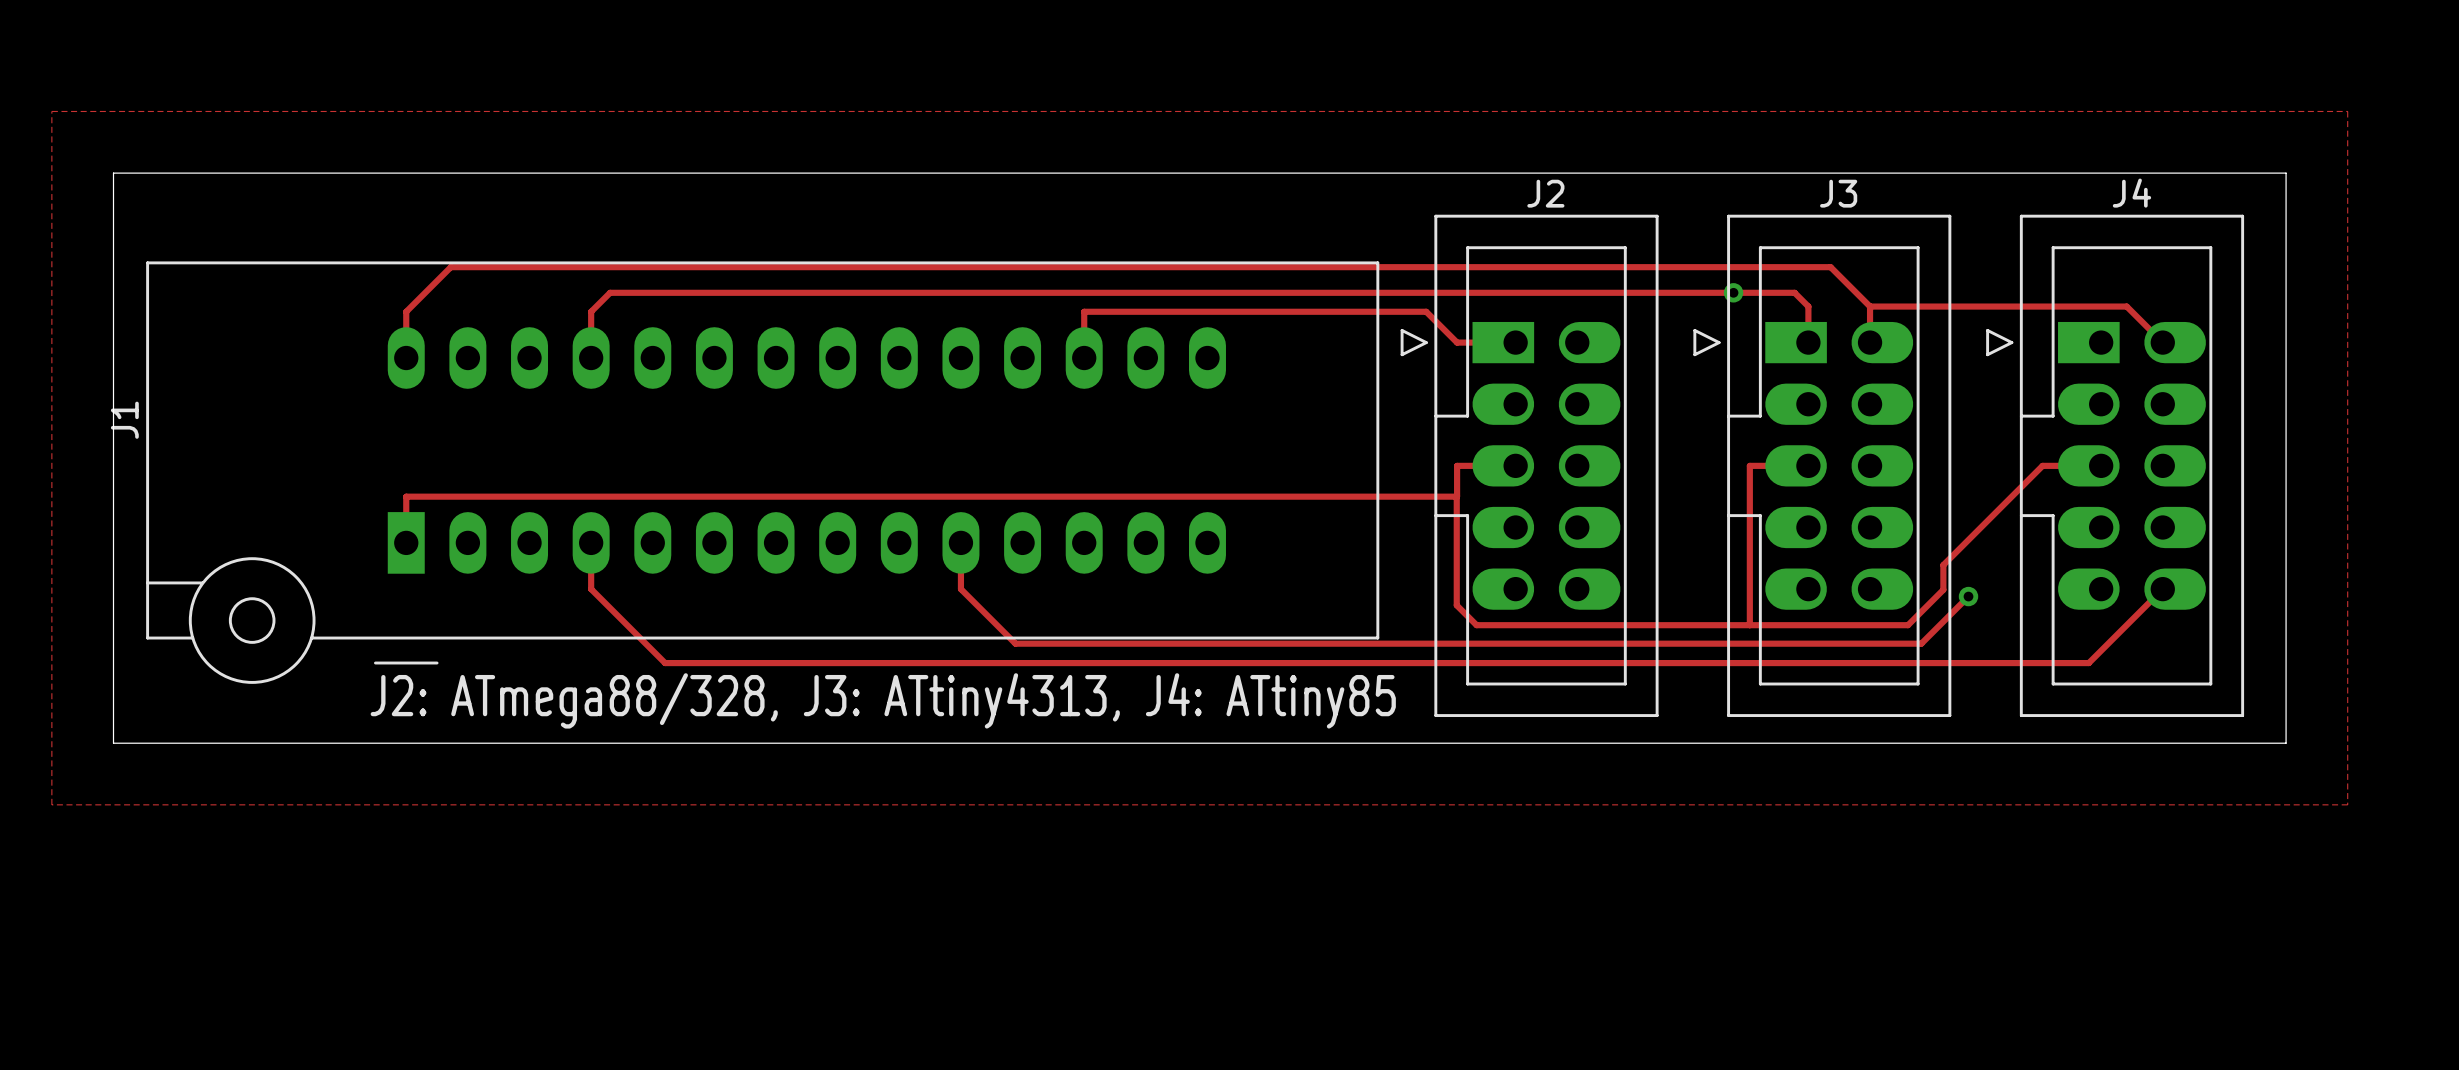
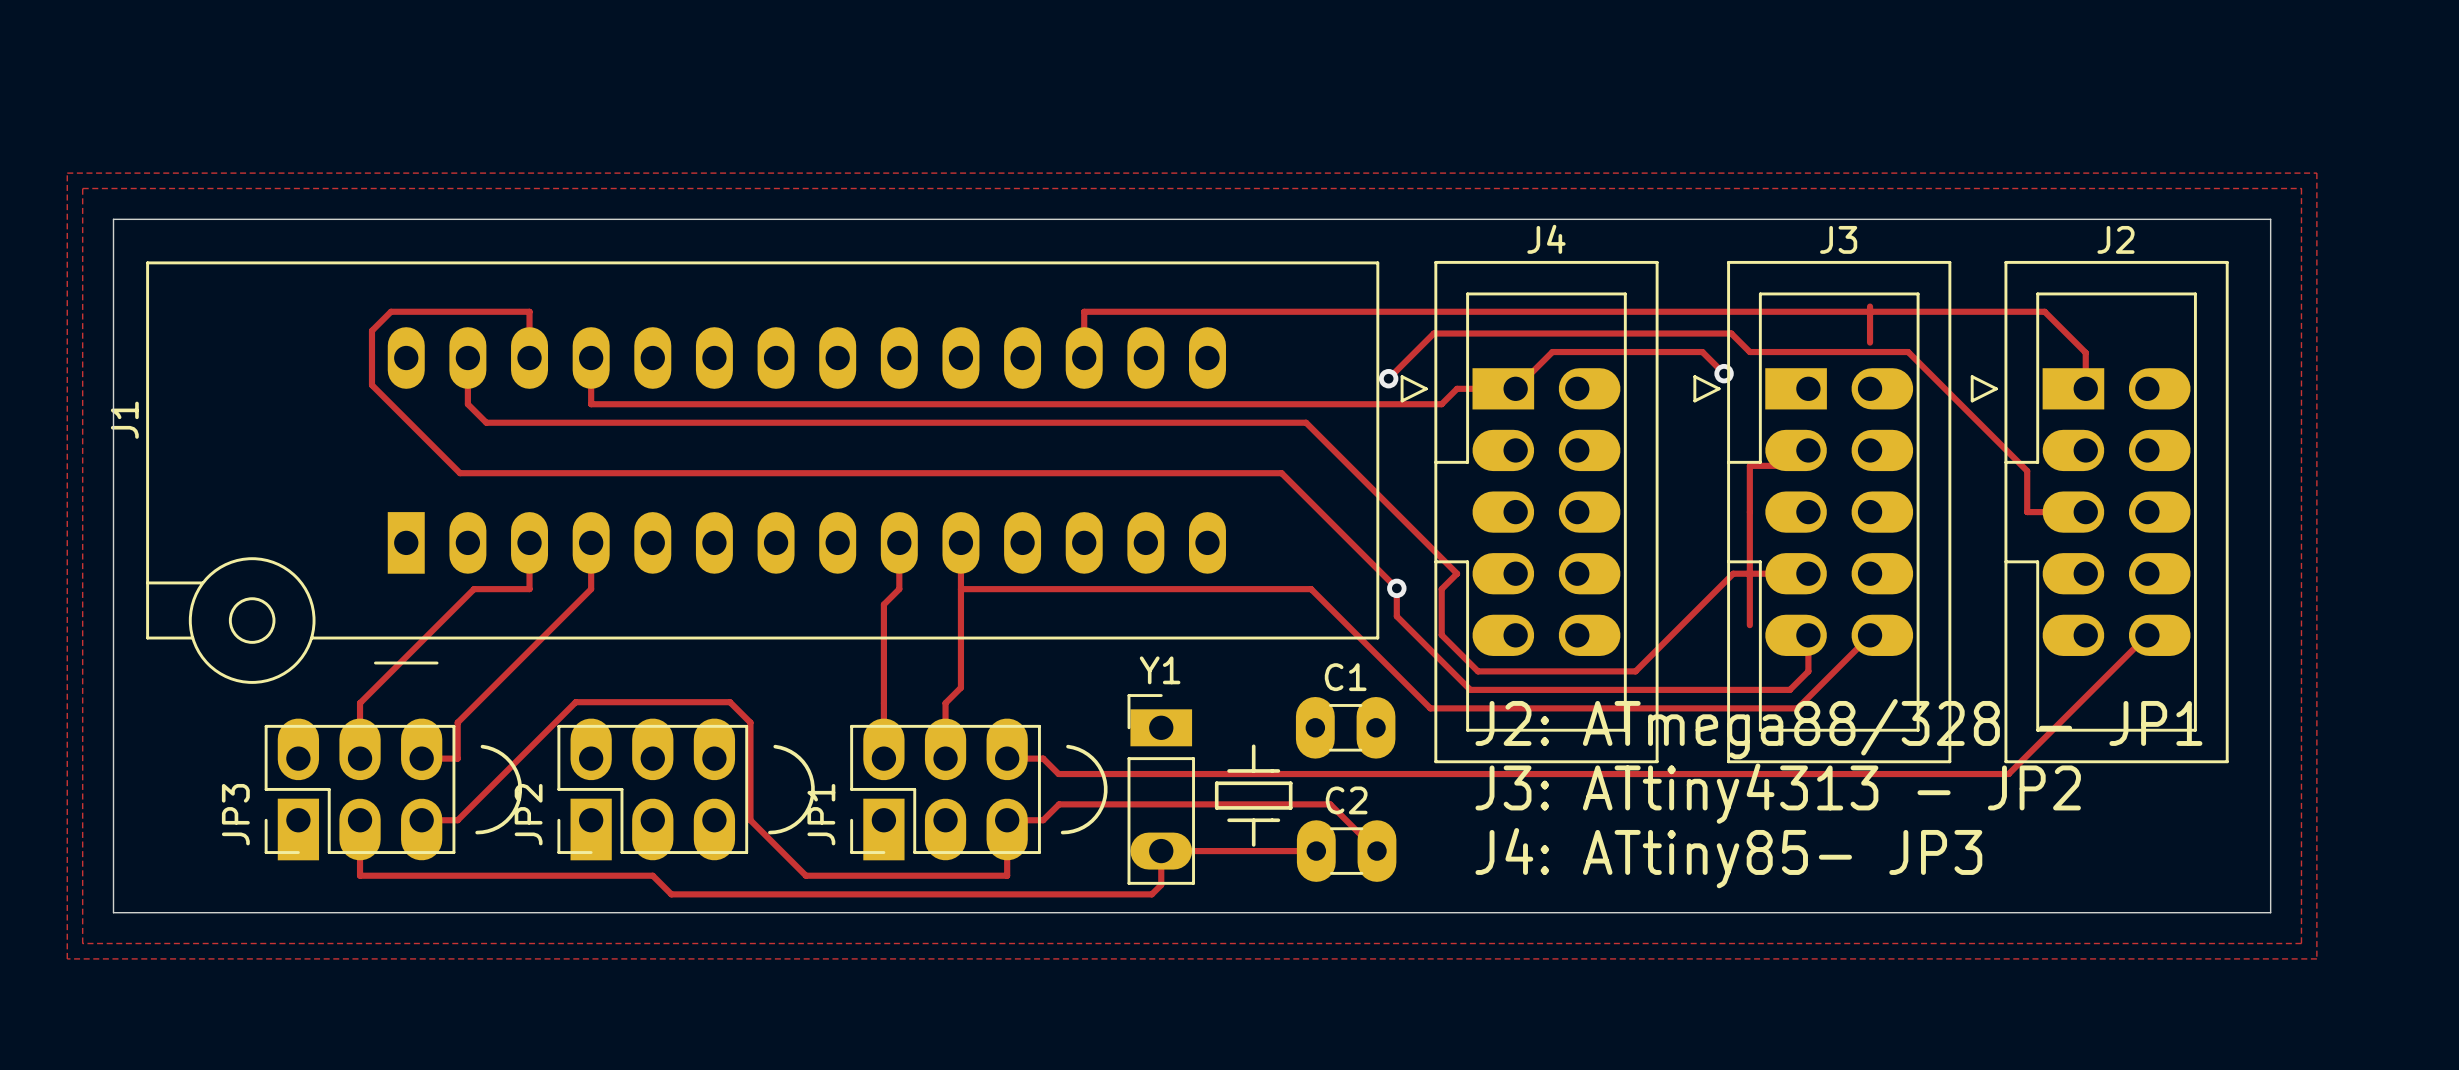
zone outline: (51, 111) (51, 804) (2347, 804) (2347, 111) (51, 111) -> (67, 173) (67, 958) (2316, 958) (2316, 173) (67, 173)
zone outline: none -> (82, 188) (82, 943) (2301, 943) (2301, 188) (82, 188)
board edge: (113, 219) (113, 173) (2286, 173) (2286, 743) (113, 743) -> (113, 219) (2270, 219) (2270, 912) (113, 912) (113, 743)
via position: (1733, 292) -> (1724, 373)
track: (1426, 311) (1457, 342) (1515, 342) -> (1426, 311) (2044, 311) (2085, 352) (2085, 388)
track: (1808, 342) (1808, 306) (1794, 292) (610, 292) (591, 311) (591, 358) -> (1724, 373) (1702, 352) (1552, 352) (1515, 388) (1457, 388) (1441, 404) (591, 404) (591, 358)
track: (2162, 342) (2126, 306) (1870, 306) (1830, 267) (450, 267) (406, 311) (406, 358) -> none
track: none -> (467, 358) (467, 404) (486, 422) (1306, 422) (1457, 573) (1441, 589) (1441, 635) (1478, 671) (1635, 671) (1733, 573) (1808, 573)
track: none -> (529, 358) (529, 311) (391, 311) (371, 330) (371, 385) (460, 473) (1281, 473) (1396, 588) (1396, 616) (1470, 689) (1789, 689) (1808, 671) (1808, 635)
track: none -> (1388, 378) (1433, 333) (1731, 333) (1749, 352) (1908, 352) (2027, 471) (2027, 512) (2085, 512)
via: none -> (1388, 378)
track: (1515, 465) (1457, 465) (1457, 496) -> none
J2 position: (1529, 465) -> (2099, 512)
J3 position: (1822, 465) -> (1822, 512)
track: (2101, 465) (2042, 465) (1943, 565) (1943, 589) (1908, 625) (1476, 625) (1456, 605) (1456, 496) (406, 496) (406, 542) -> none
J4 position: (2115, 465) -> (1529, 512)
track: none -> (529, 542) (529, 589) (474, 589) (360, 703) (360, 758)
track: none -> (899, 542) (899, 589) (883, 604) (883, 758)
via: none -> (1396, 588)
track: (591, 589) (665, 663) (2088, 663) (2162, 589) -> (591, 589) (457, 722) (457, 758) (421, 758)
track: (960, 589) (1015, 643) (1921, 643) (1968, 596) -> none
via: (1968, 596) -> none
track: none -> (1870, 635) (1797, 708) (1430, 708) (1311, 589) (960, 589) (960, 687) (945, 703) (945, 758)
track: none -> (2147, 635) (2008, 774) (1058, 774) (1043, 758) (1007, 758)
text: J2: ATmega88/328, J3: ATtiny4313, J4: ATtiny85 (883, 700) -> none
C1: none -> (1345, 727)
text: none -> J2: ATmega88/328 - JP1 (1838, 729)
JP3: none -> (393, 789)
JP2: none -> (686, 789)
JP1: none -> (978, 789)
Y1: none -> (1210, 789)
text: none -> J3: ATtiny4313 - JP2 (1778, 793)
track: none -> (360, 820) (360, 875) (652, 875) (671, 894) (1151, 894) (1161, 884) (1161, 851) (1316, 851)
track: none -> (421, 820) (457, 820) (575, 702) (730, 702) (750, 722) (750, 820) (805, 875) (1007, 875) (1007, 820) (1043, 820) (1059, 804) (1330, 804) (1376, 851)
C2: none -> (1346, 851)
text: none -> J4: ATtiny85- JP3 (1728, 858)

